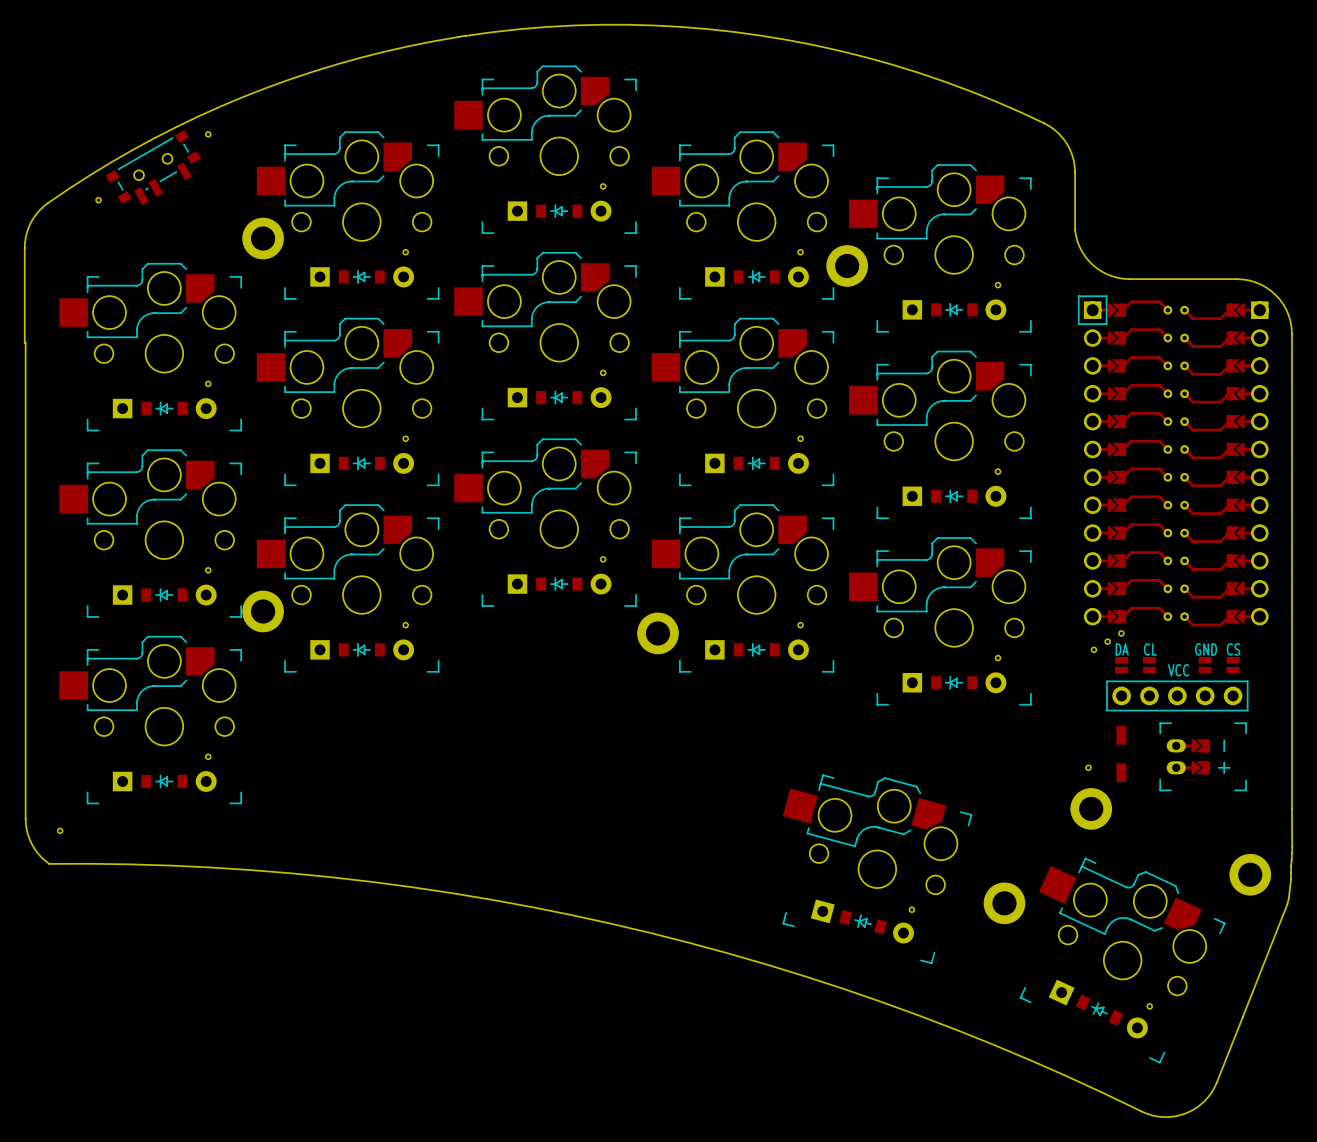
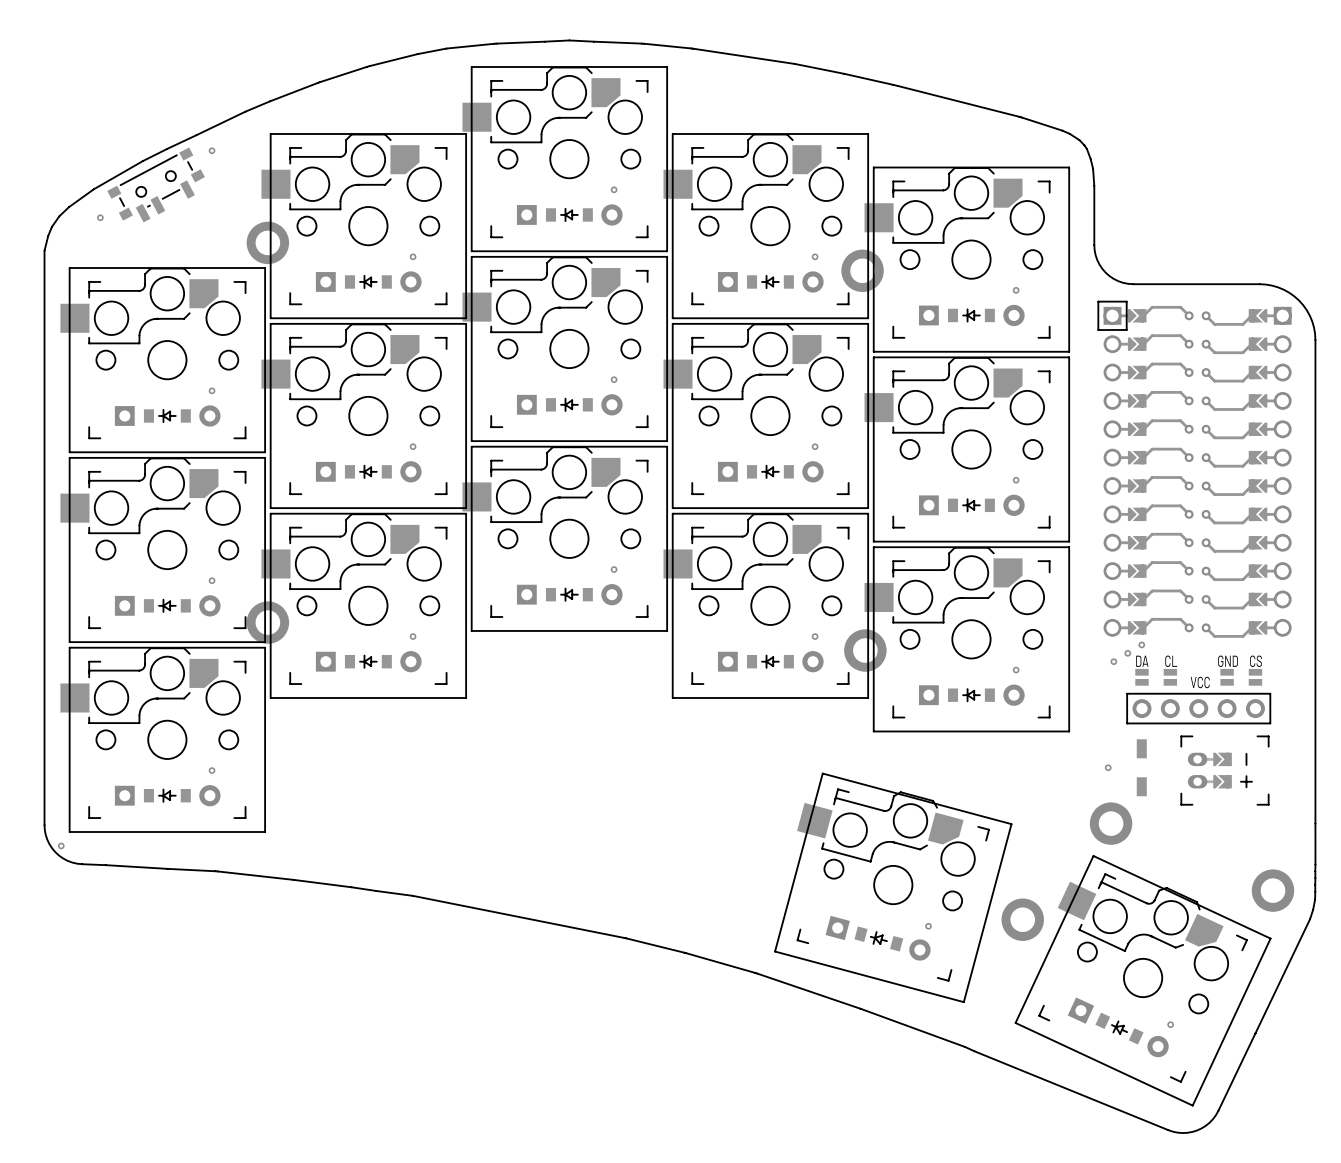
board edge: none -> (471, 66) (471, 251) (667, 251) (667, 66) (471, 66)
board edge: none -> (270, 133) (270, 318) (466, 318) (466, 133) (270, 133)
board edge: none -> (672, 133) (868, 133) (868, 318) (672, 318) (672, 133)
part position: (208, 134) -> (212, 150)
board edge: none -> (873, 167) (873, 351) (1069, 351) (1069, 167) (873, 167)
part: (153, 167) -> none
part: none -> (156, 184)
part position: (98, 200) -> (100, 217)
board edge: none -> (471, 256) (471, 441) (667, 441) (667, 256) (471, 256)
board edge: none -> (69, 268) (69, 452) (265, 452) (265, 268) (69, 268)
board edge: (1129, 279) (1112, 276) (1102, 271) (1088, 261) (1082, 251) (1075, 230) (1073, 160) (1063, 138) (1049, 126) (994, 101) (919, 72) (841, 51) (761, 35) (681, 26) (600, 24) (519, 29) (462, 36) (385, 51) (313, 71) (243, 96) (176, 127) (110, 162) (48, 202) (33, 218) (25, 237) (25, 818) (27, 834) (34, 848) (49, 863) (210, 867) (371, 881) (491, 899) (649, 932) (766, 964) (881, 1001) (1031, 1060) (1146, 1113) (1169, 1117) (1185, 1113) (1200, 1105) (1211, 1092) (1216, 1082) (1287, 904) (1291, 879) (1291, 808) -> (1150, 284) (1128, 283) (1118, 281) (1109, 276) (1099, 264) (1094, 250) (1093, 168) (1084, 145) (1069, 133) (1020, 117) (893, 84) (795, 63) (693, 48) (643, 43) (569, 40) (495, 43) (446, 48) (369, 66) (319, 82) (245, 111) (167, 148) (93, 189) (69, 207) (51, 226) (44, 250) (44, 830) (47, 839) (55, 852) (67, 860) (77, 863) (217, 871) (413, 895) (624, 937) (685, 952) (755, 973) (861, 1009) (965, 1046) (1177, 1132) (1197, 1130) (1213, 1119) (1255, 1033)
board edge: none -> (270, 323) (270, 508) (466, 508) (466, 323) (270, 323)
board edge: none -> (672, 323) (868, 323) (868, 508) (672, 508) (672, 323)
board edge: none -> (873, 357) (873, 541) (1069, 541) (1069, 357) (873, 357)
board edge: none -> (471, 446) (667, 446) (667, 630) (471, 630) (471, 446)
board edge: none -> (69, 457) (69, 642) (265, 642) (265, 457) (69, 457)
board edge: none -> (270, 513) (466, 513) (466, 697) (270, 697) (270, 513)
board edge: none -> (672, 513) (868, 513) (868, 697) (672, 697) (672, 513)
board edge: none -> (873, 547) (1069, 547) (1069, 731) (873, 731) (873, 547)
part position: (657, 633) -> (865, 650)
board edge: none -> (69, 647) (265, 647) (265, 831) (69, 831) (69, 647)
board edge: none -> (822, 773) (1011, 824) (963, 1002) (775, 951) (822, 773)
part position: (1088, 767) -> (1108, 767)
board edge: none -> (1315, 823) (1315, 891) (1313, 909) (1255, 1033)
board edge: none -> (1093, 855) (1270, 938) (1192, 1105) (1015, 1022) (1093, 855)

